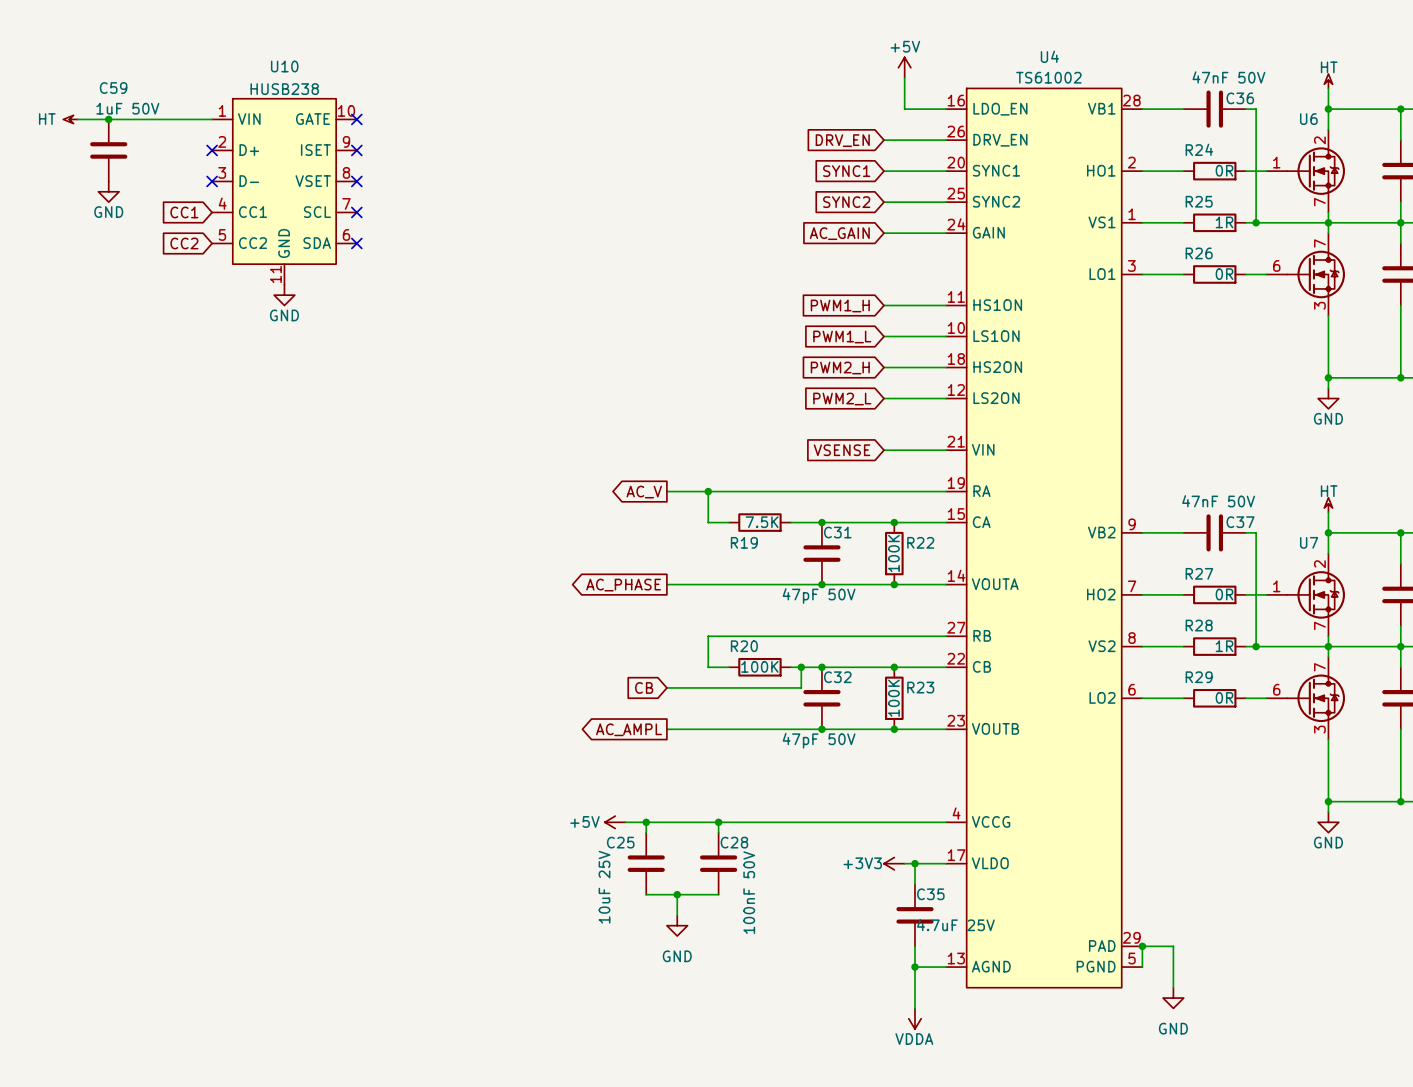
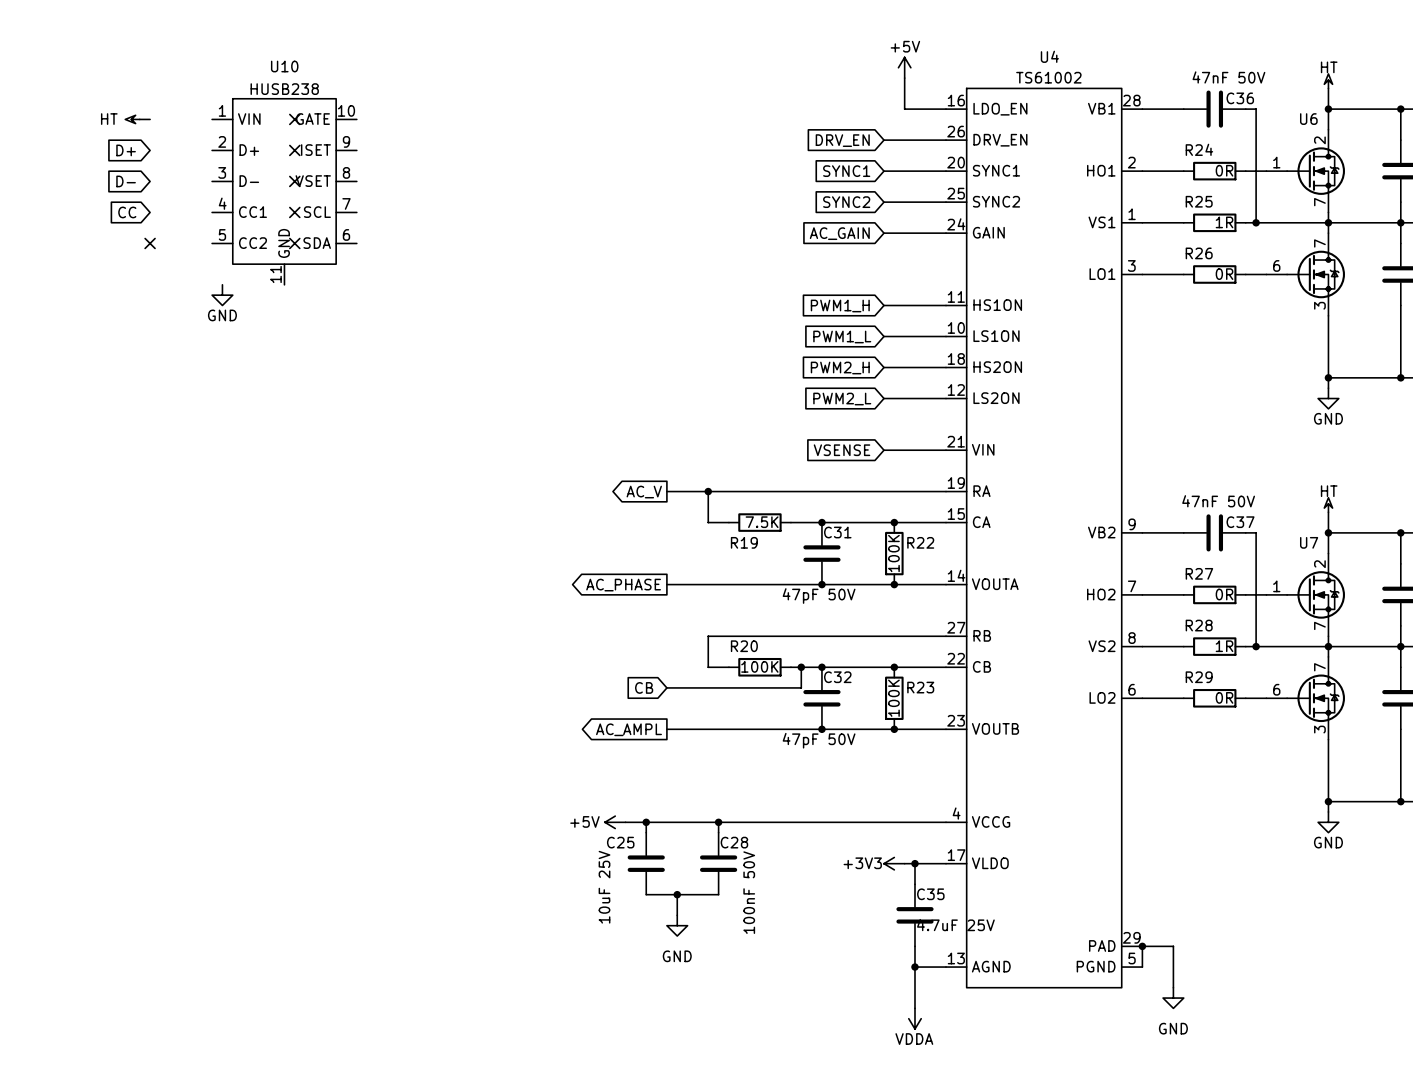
power symbol position: HT (70, 119) -> HT (132, 119)
wire: (77, 119) (139, 119) -> none
junction: (108, 119) -> none
wire: (150, 119) (212, 119) -> none
no-connect mark: none -> (294, 119)
no-connect mark: (356, 119) -> none
C59: 1uF 50V (108, 150) -> none
global label: none -> D+ (126, 150)
no-connect mark: (212, 150) -> none
no-connect mark: none -> (294, 150)
no-connect mark: (356, 150) -> none
global label: none -> D- (126, 181)
no-connect mark: (212, 181) -> none
no-connect mark: none -> (294, 181)
no-connect mark: (356, 181) -> none
power symbol: GND (108, 191) -> none
global label: none -> CC (127, 212)
global label: CC1 (184, 212) -> none
no-connect mark: none -> (294, 212)
no-connect mark: (356, 212) -> none
no-connect mark: none -> (150, 243)
global label: CC2 (184, 243) -> none
no-connect mark: none -> (294, 243)
no-connect mark: (356, 243) -> none
power symbol position: GND (284, 295) -> GND (222, 295)

